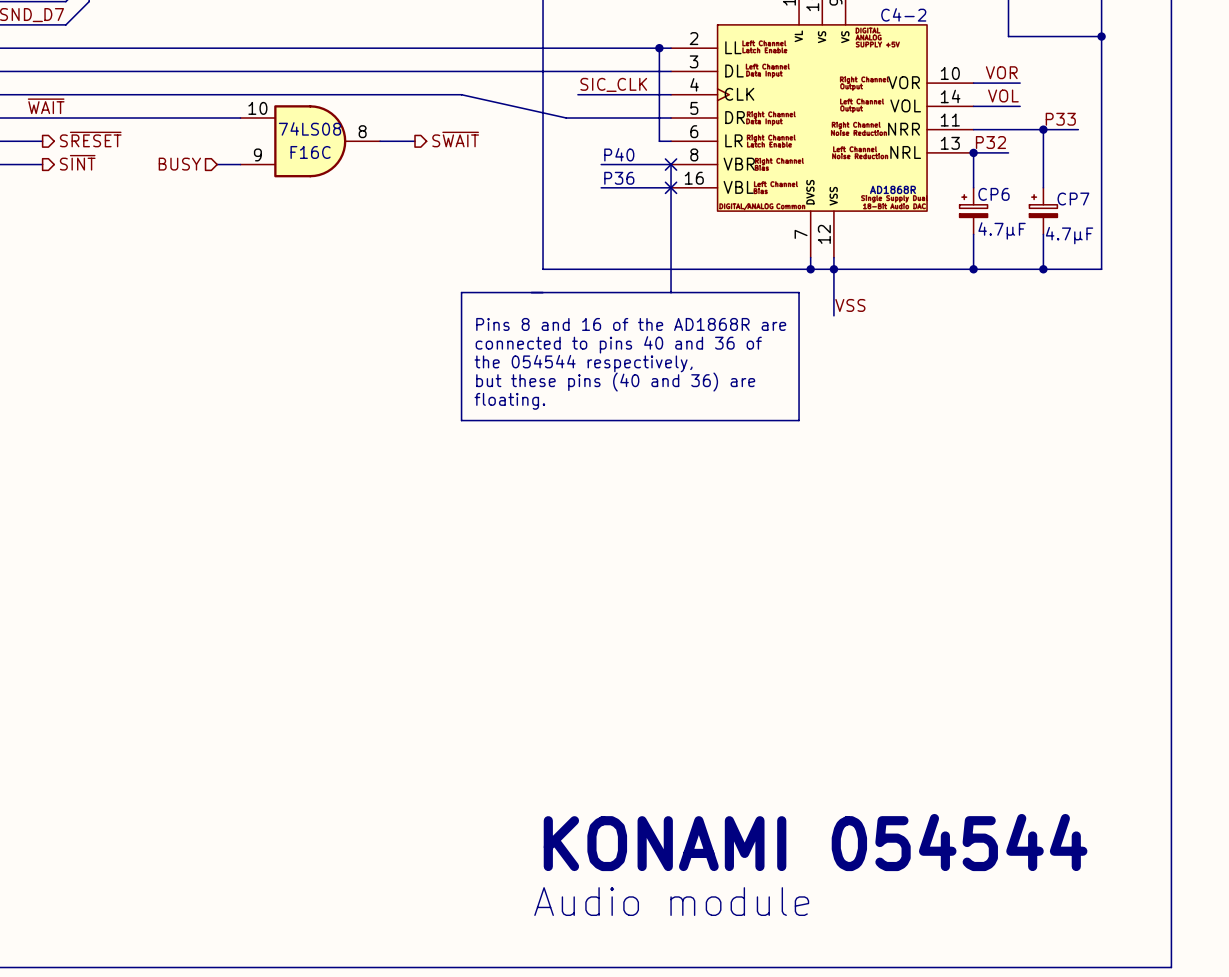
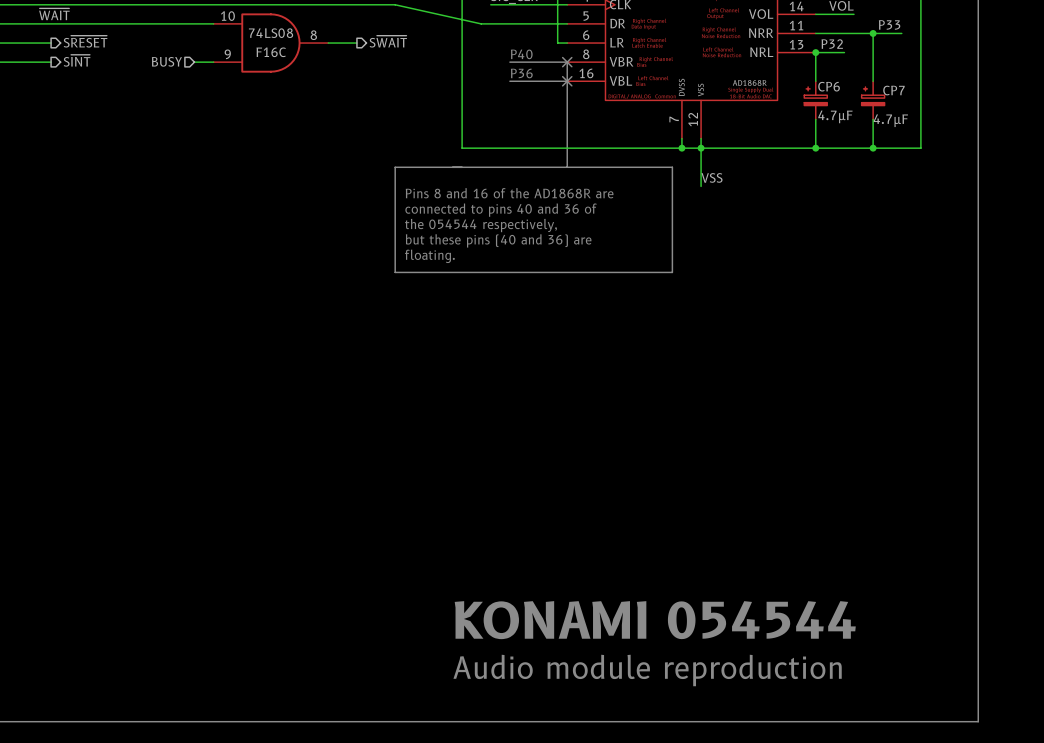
text: Audio module (671, 901) -> Audio module reproduction (647, 670)

